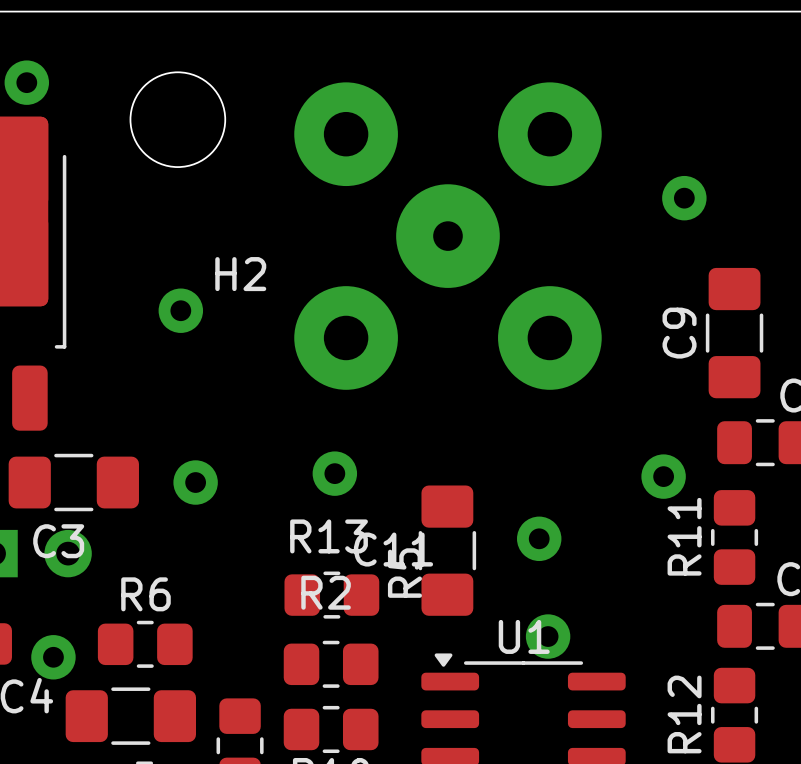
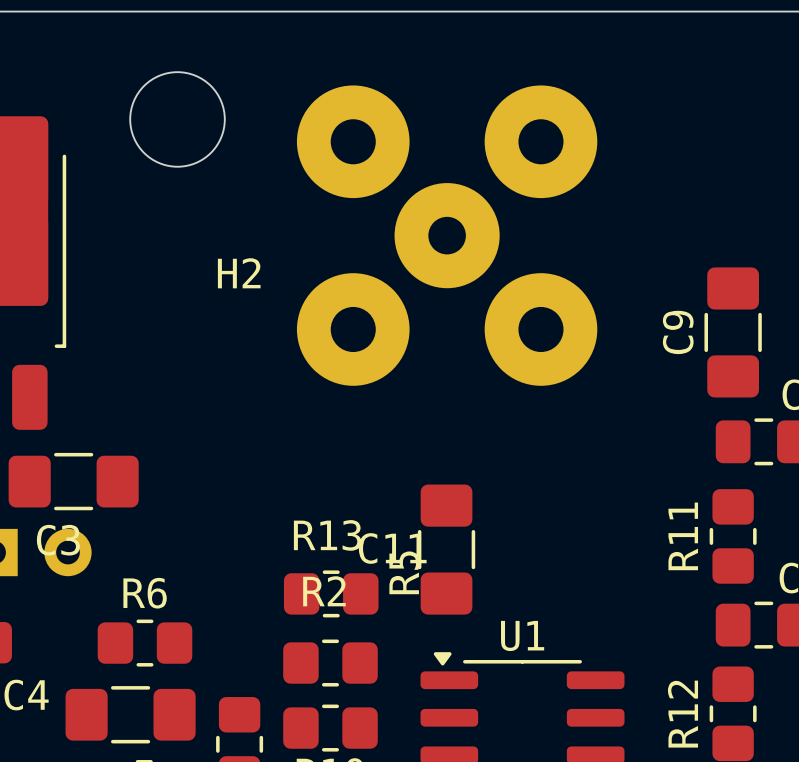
part: (26, 82) -> none
part footprint: [294, 82, 602, 390] -> [296, 85, 598, 386]
part: (684, 198) -> none
part: (180, 310) -> none
part: (334, 473) -> none
part: (663, 476) -> none
part: (195, 482) -> none
part: (539, 538) -> none
part: (548, 636) -> none
part: (53, 657) -> none

